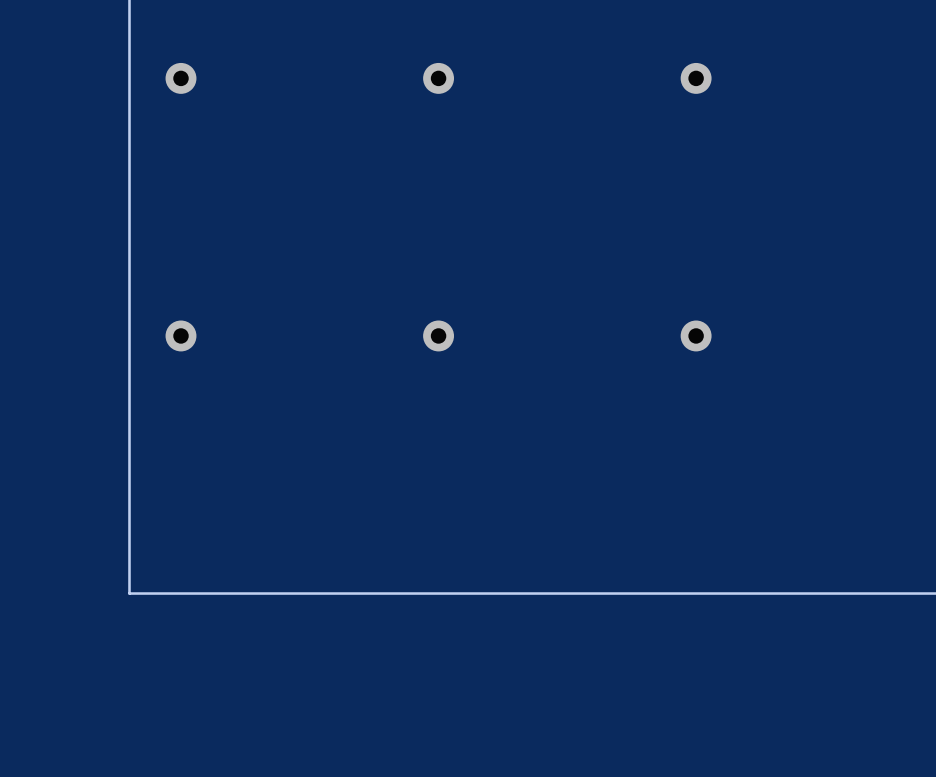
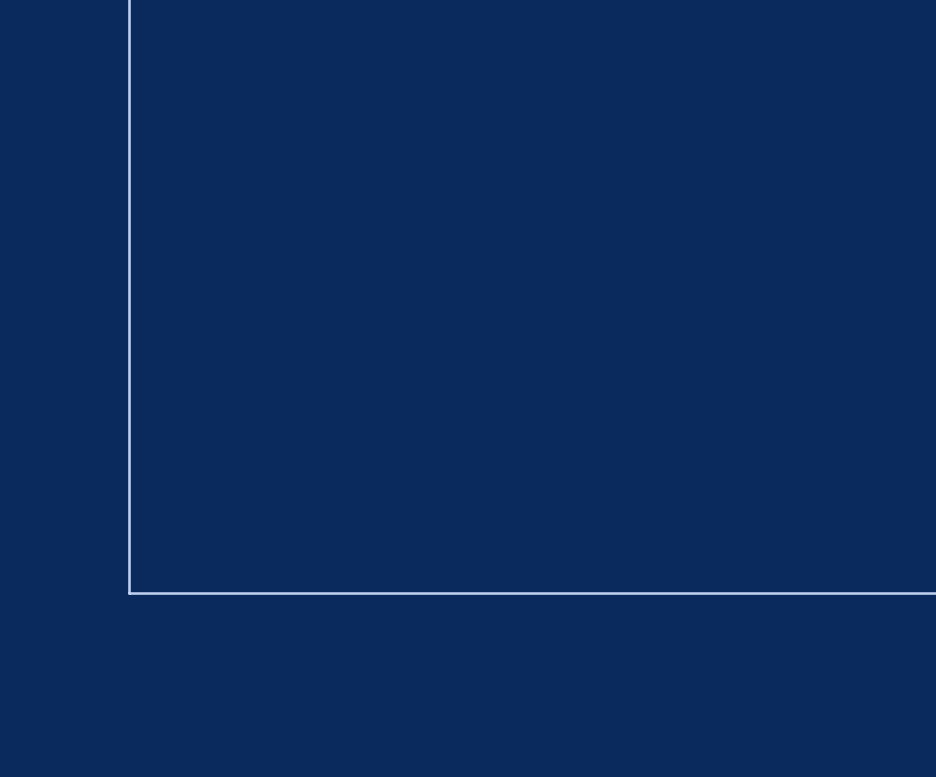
via: (181, 78) -> none
via: (438, 78) -> none
via: (696, 78) -> none
via: (181, 335) -> none
via: (438, 335) -> none
via: (696, 335) -> none

